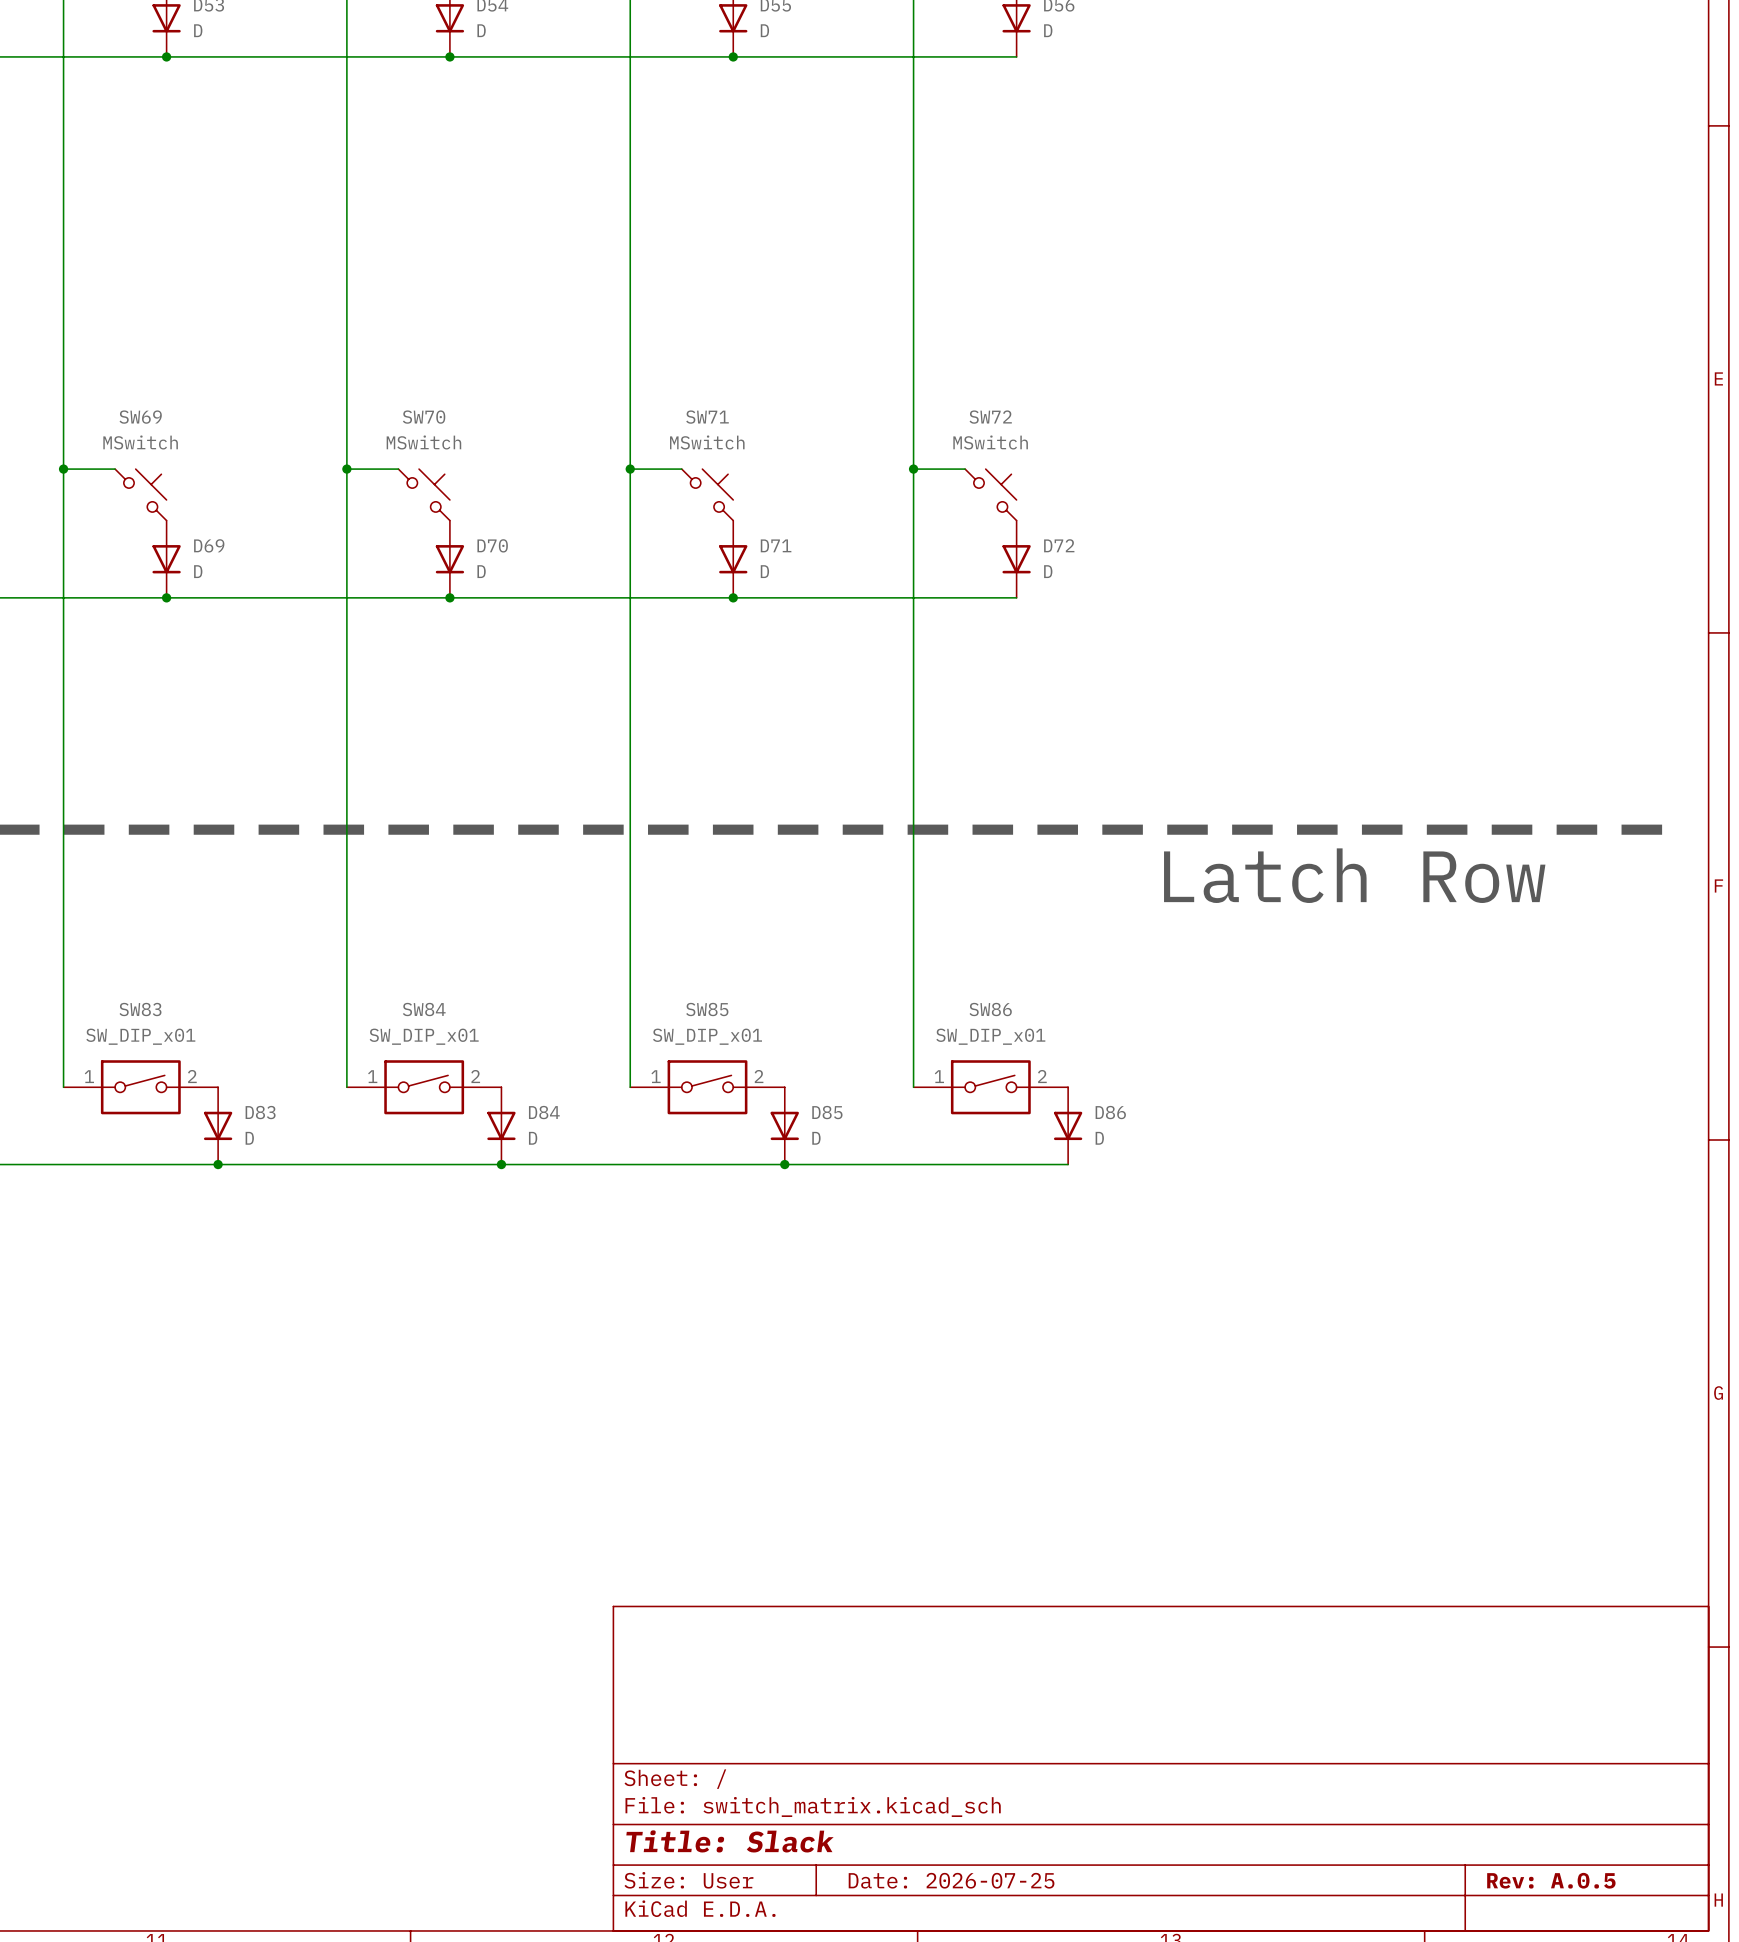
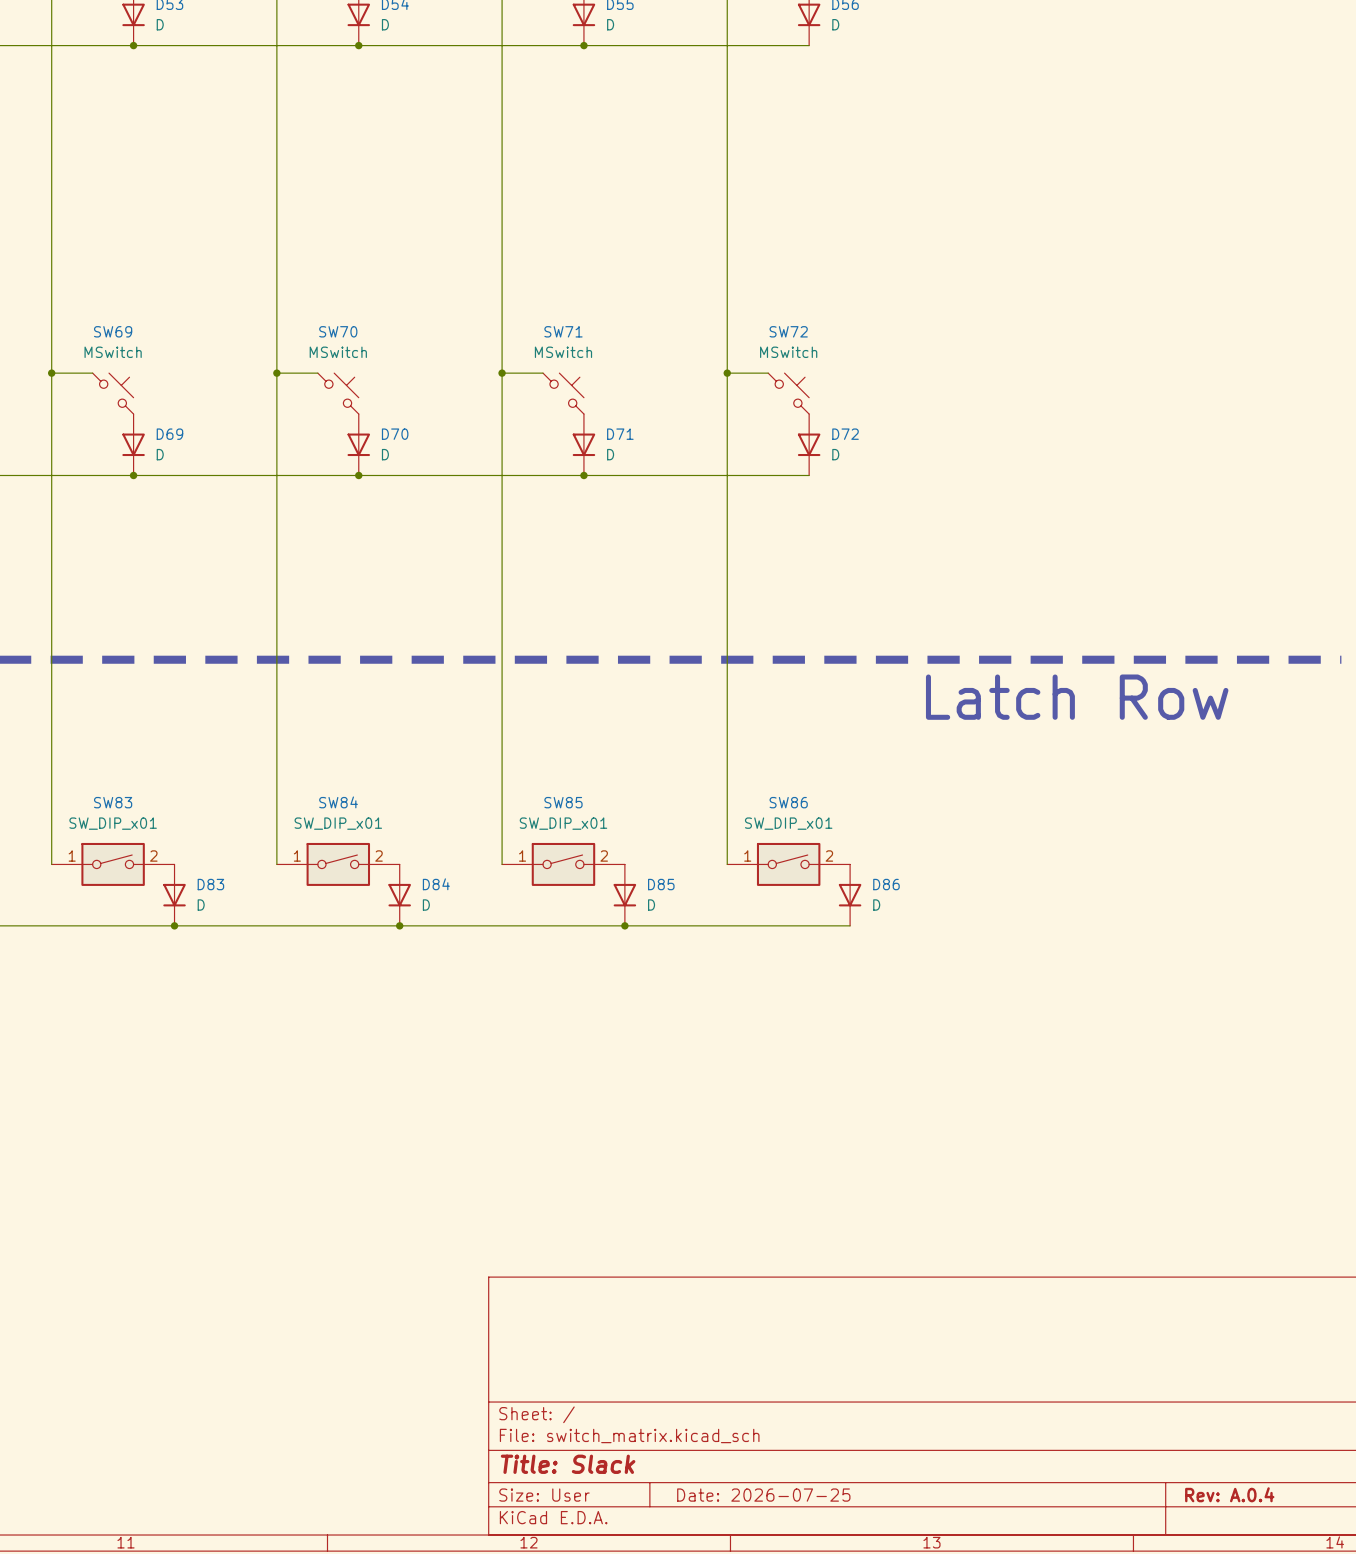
title block: Rev: A.0.5 (1551, 1880) -> Rev: A.0.4 (1229, 1494)

